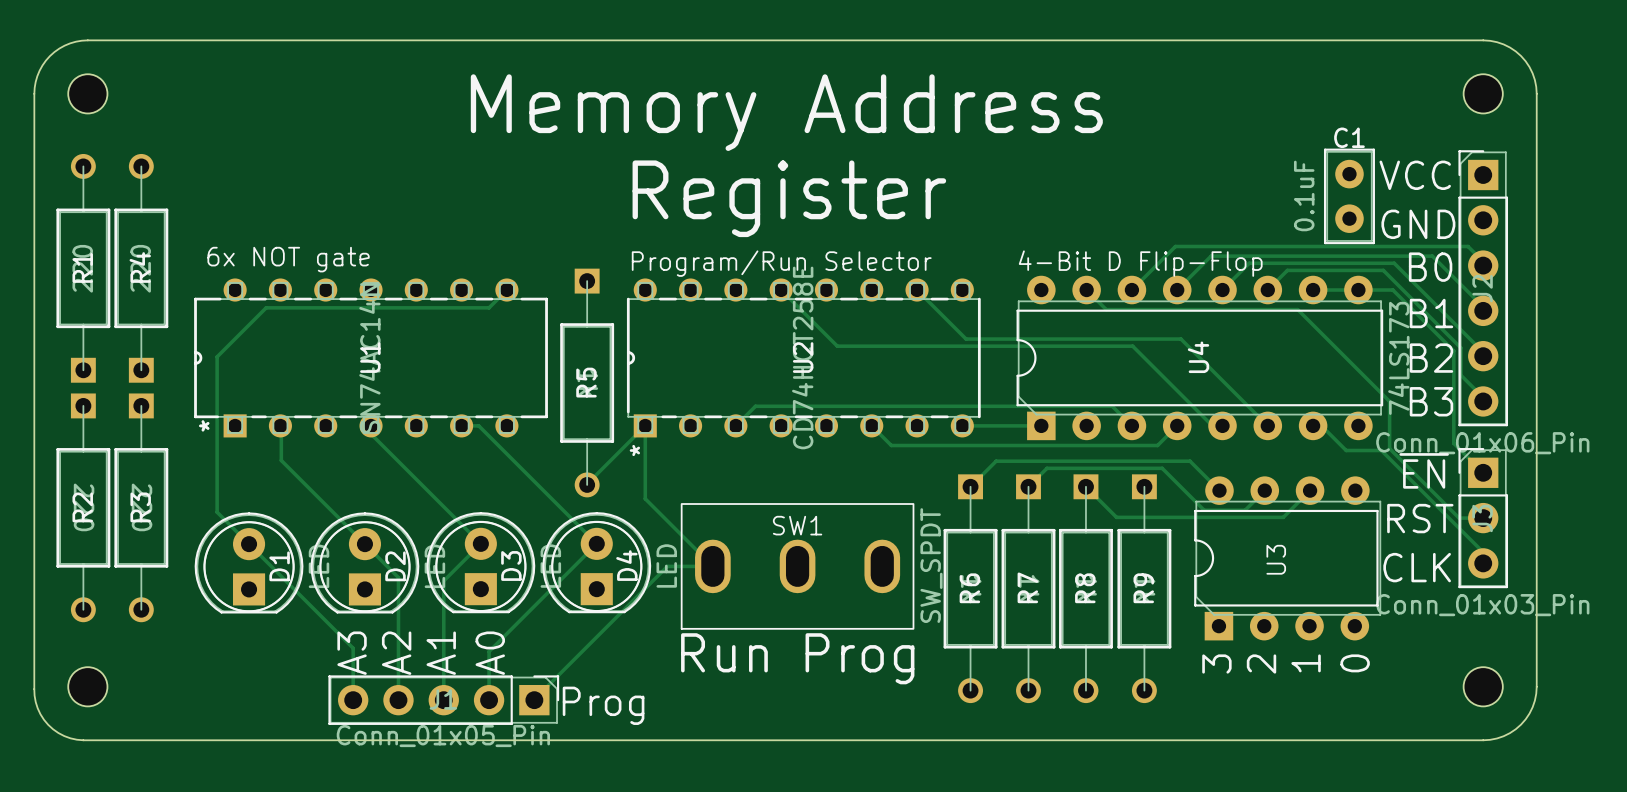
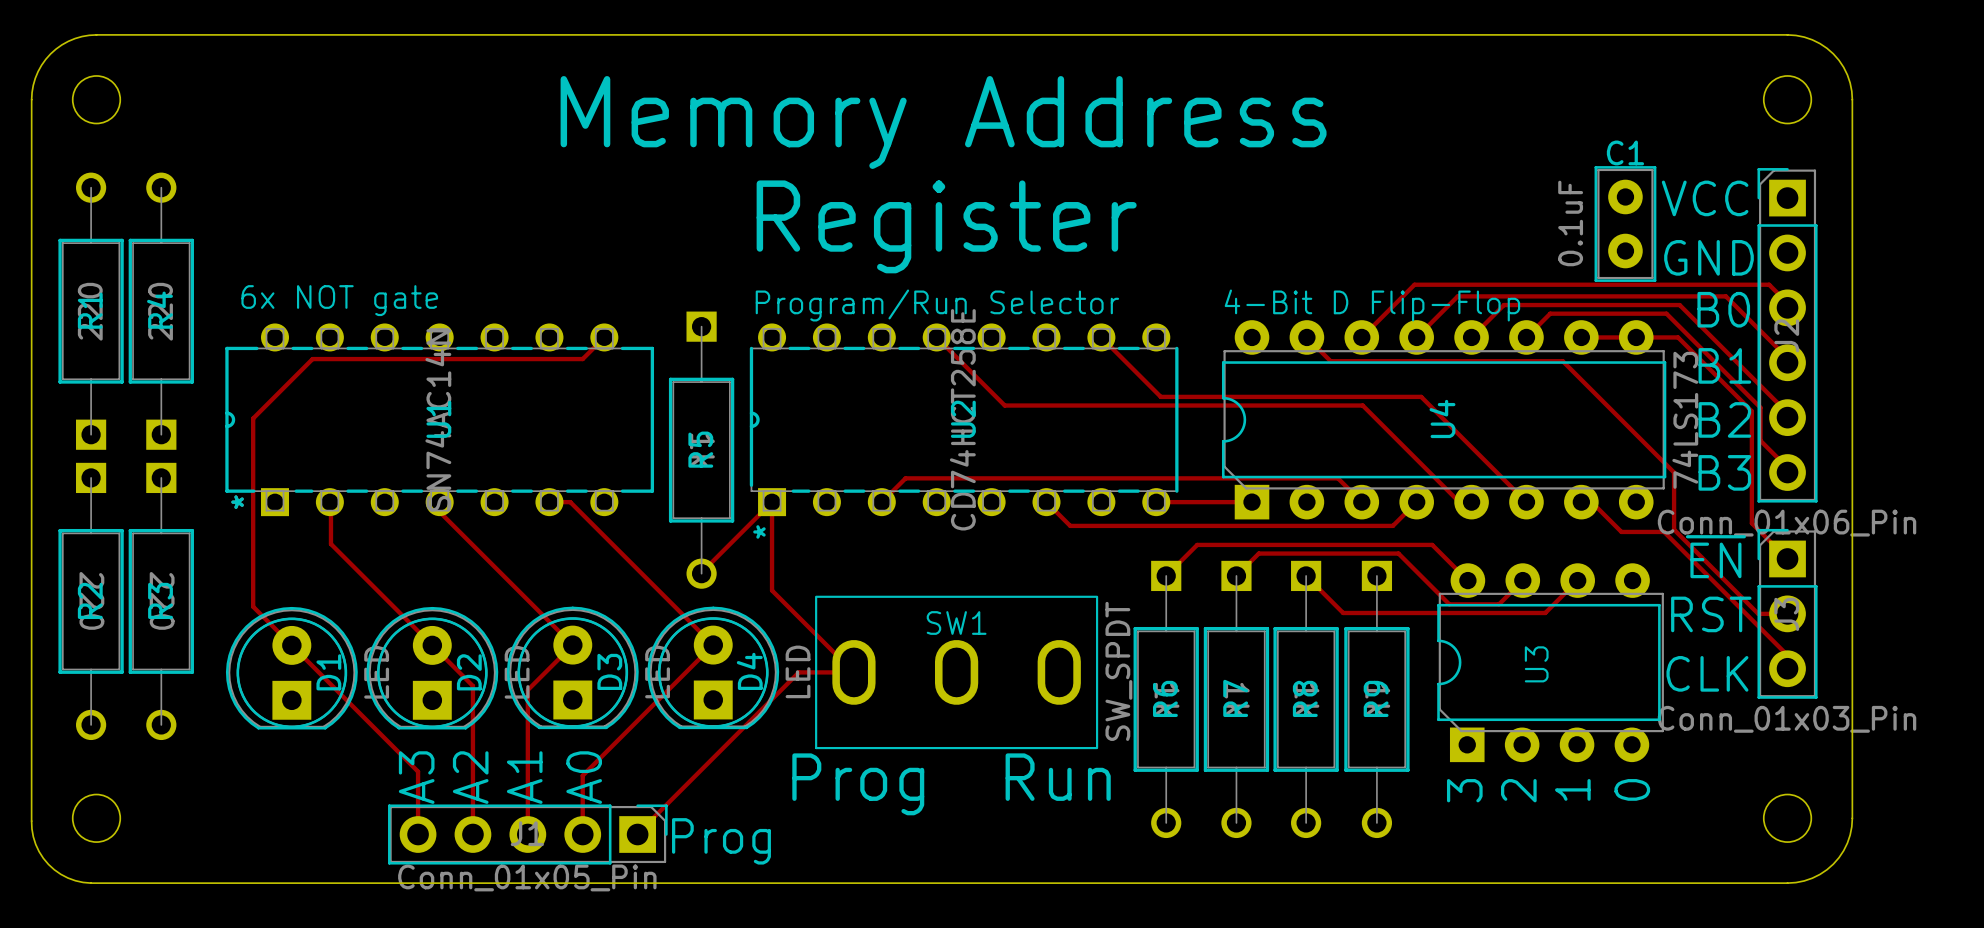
text position: Run (724, 652) -> Run (1058, 777)
text position: Prog (859, 658) -> Prog (858, 784)

